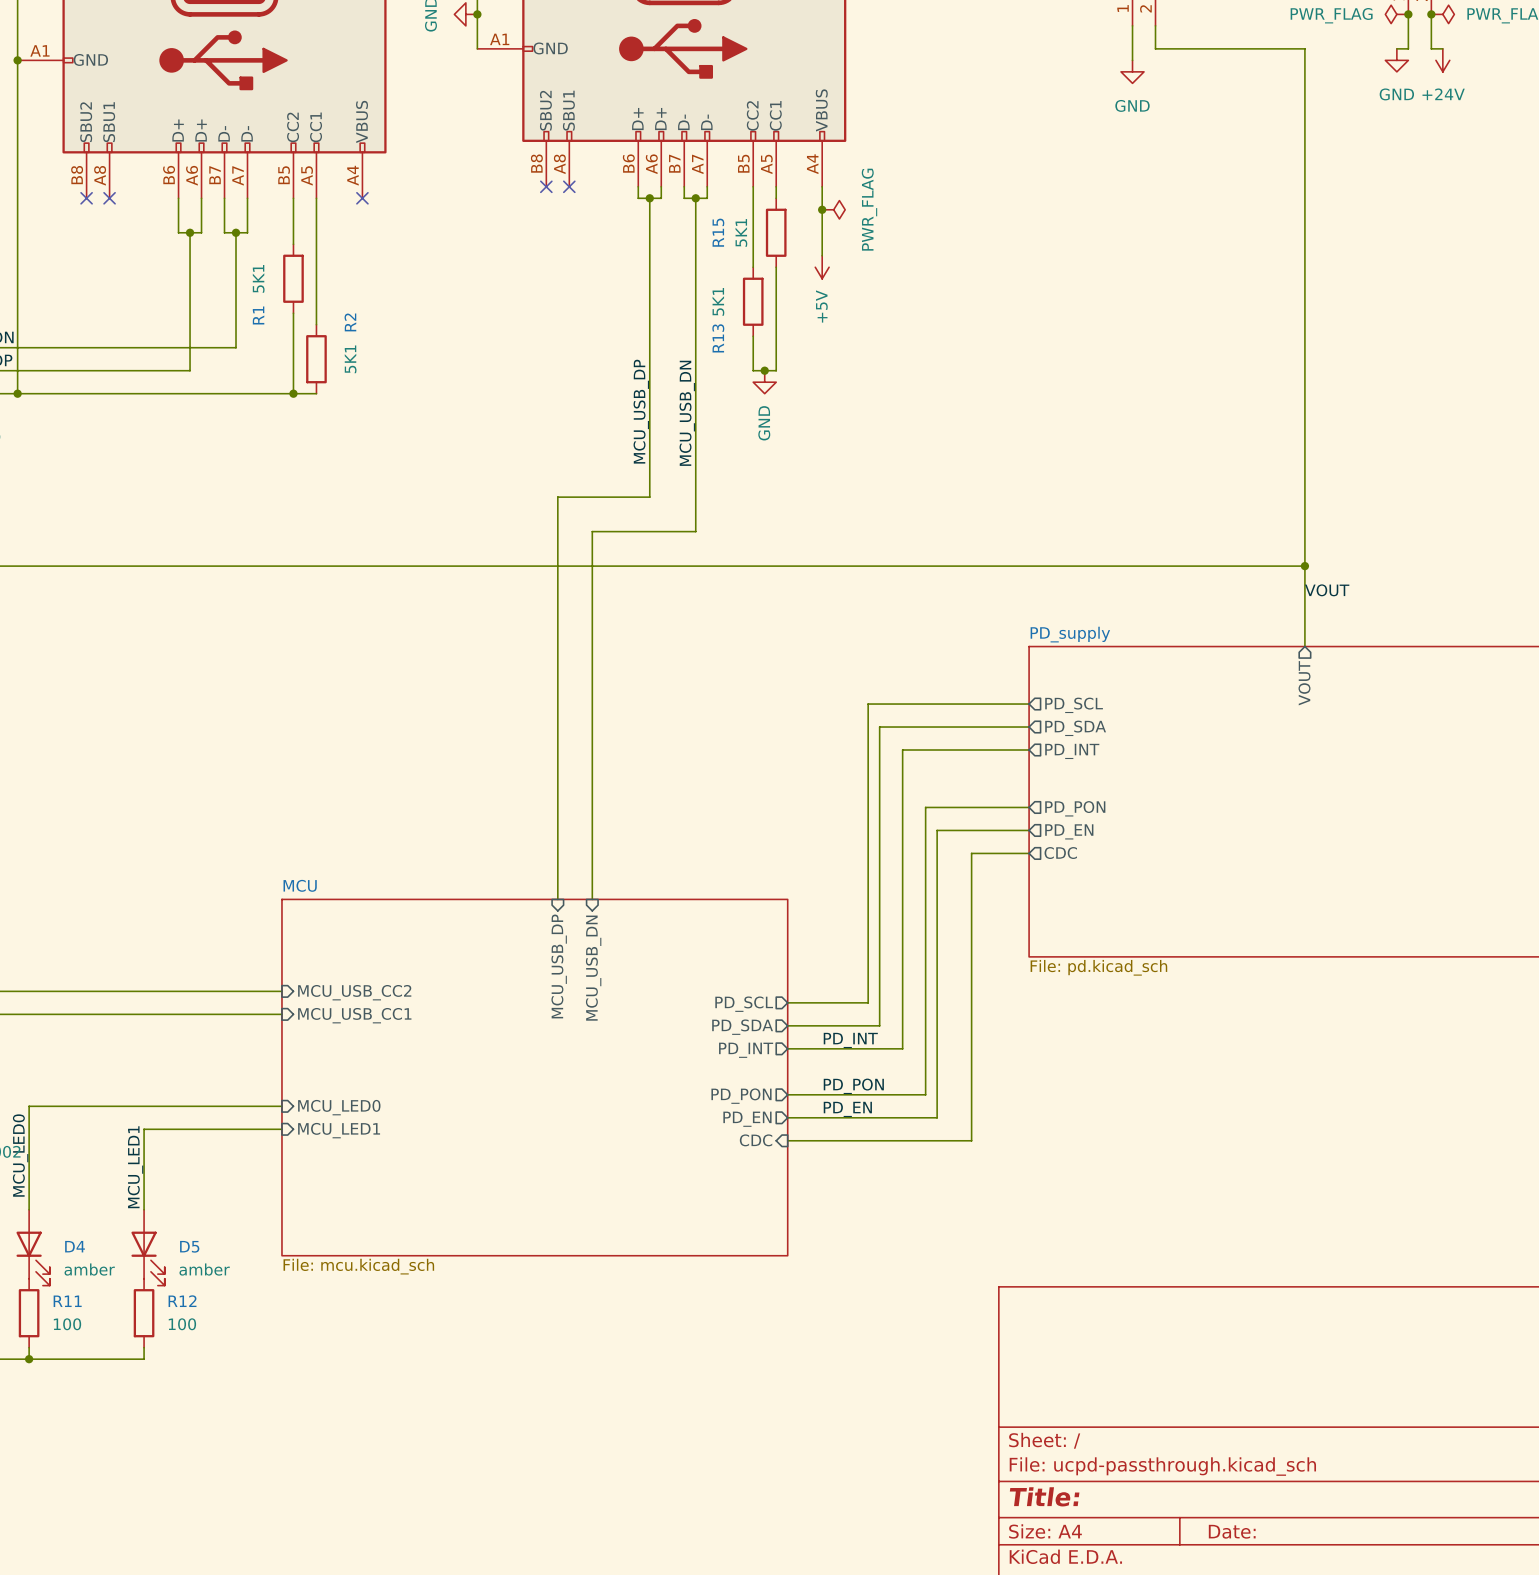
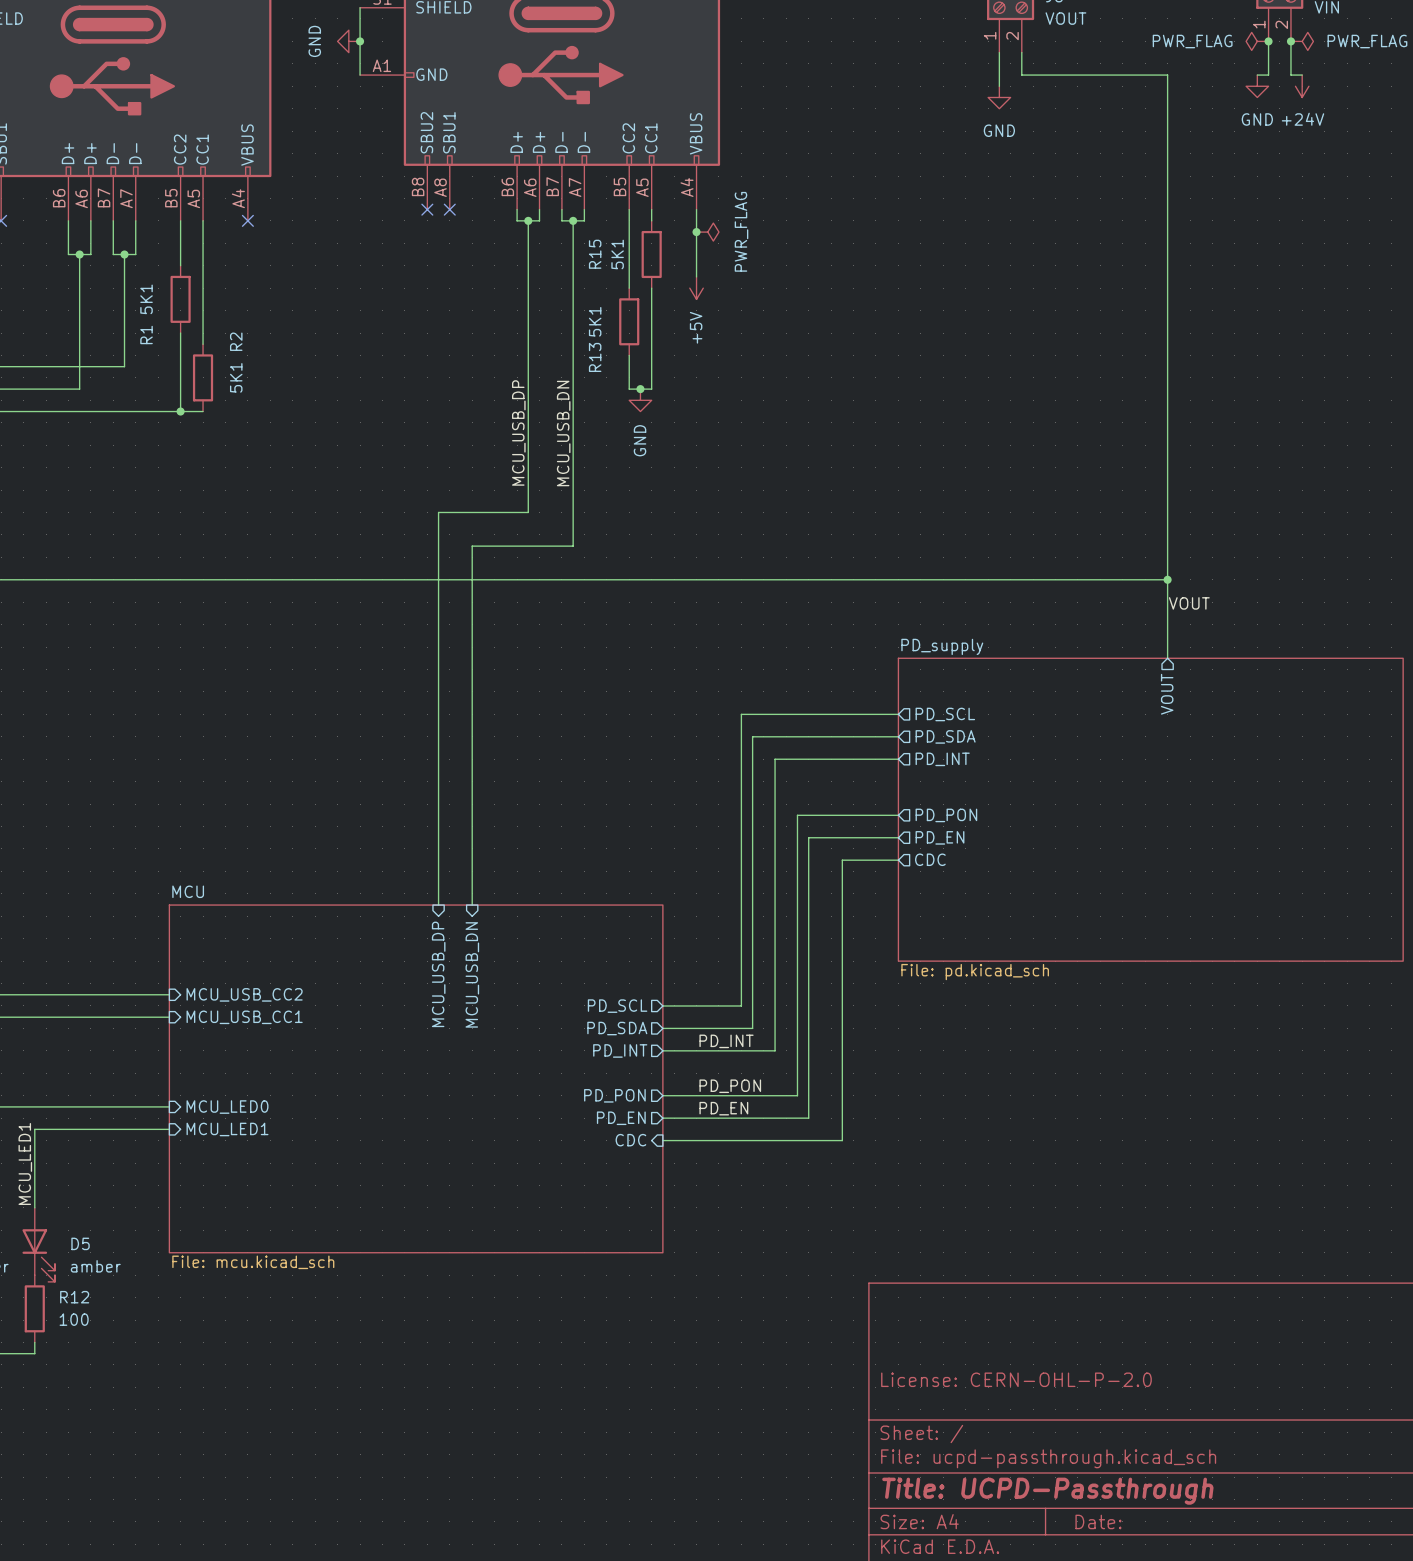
title block: none -> License: CERN-OHL-P-2.0 (1016, 1379)
title block: Title: (1044, 1496) -> Title: UCPD-Passthrough (1047, 1491)

